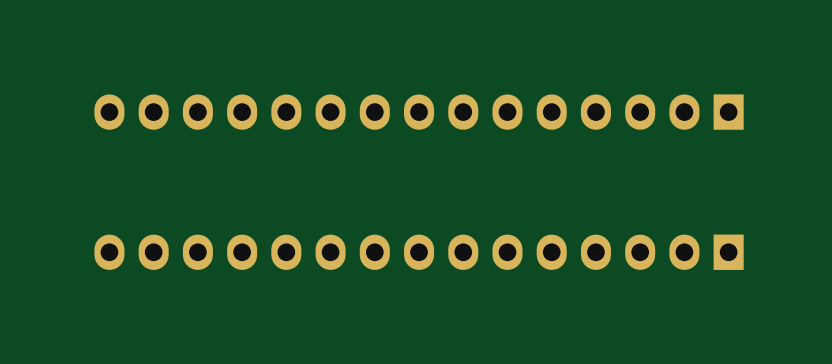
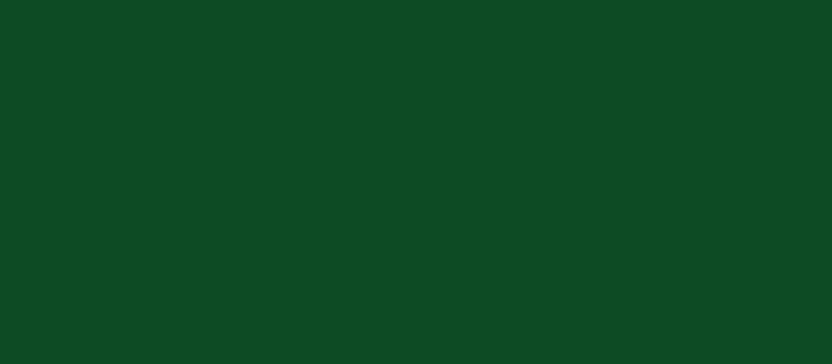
part: (419, 112) -> none
part: (419, 252) -> none

